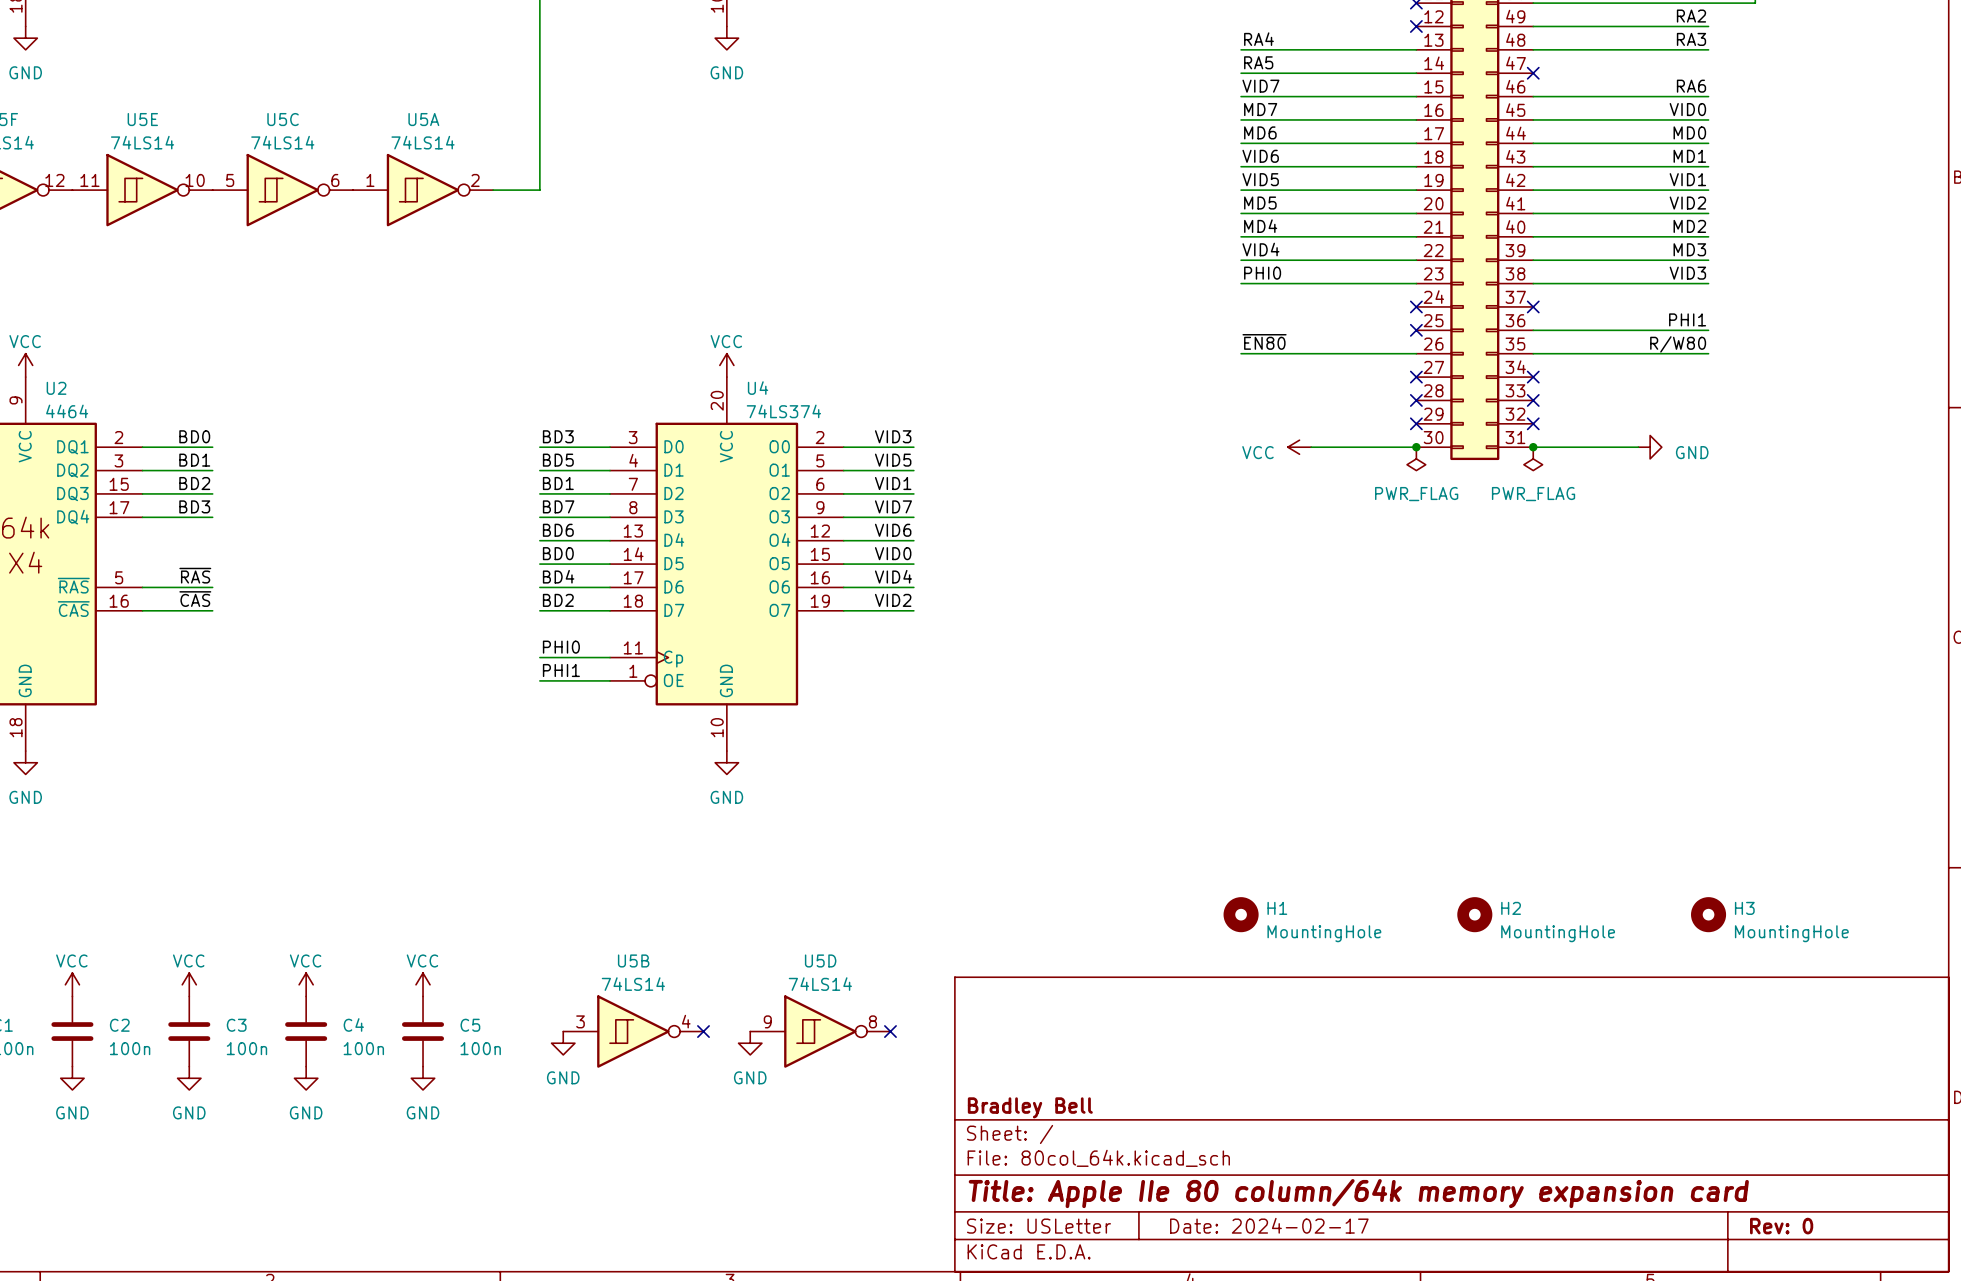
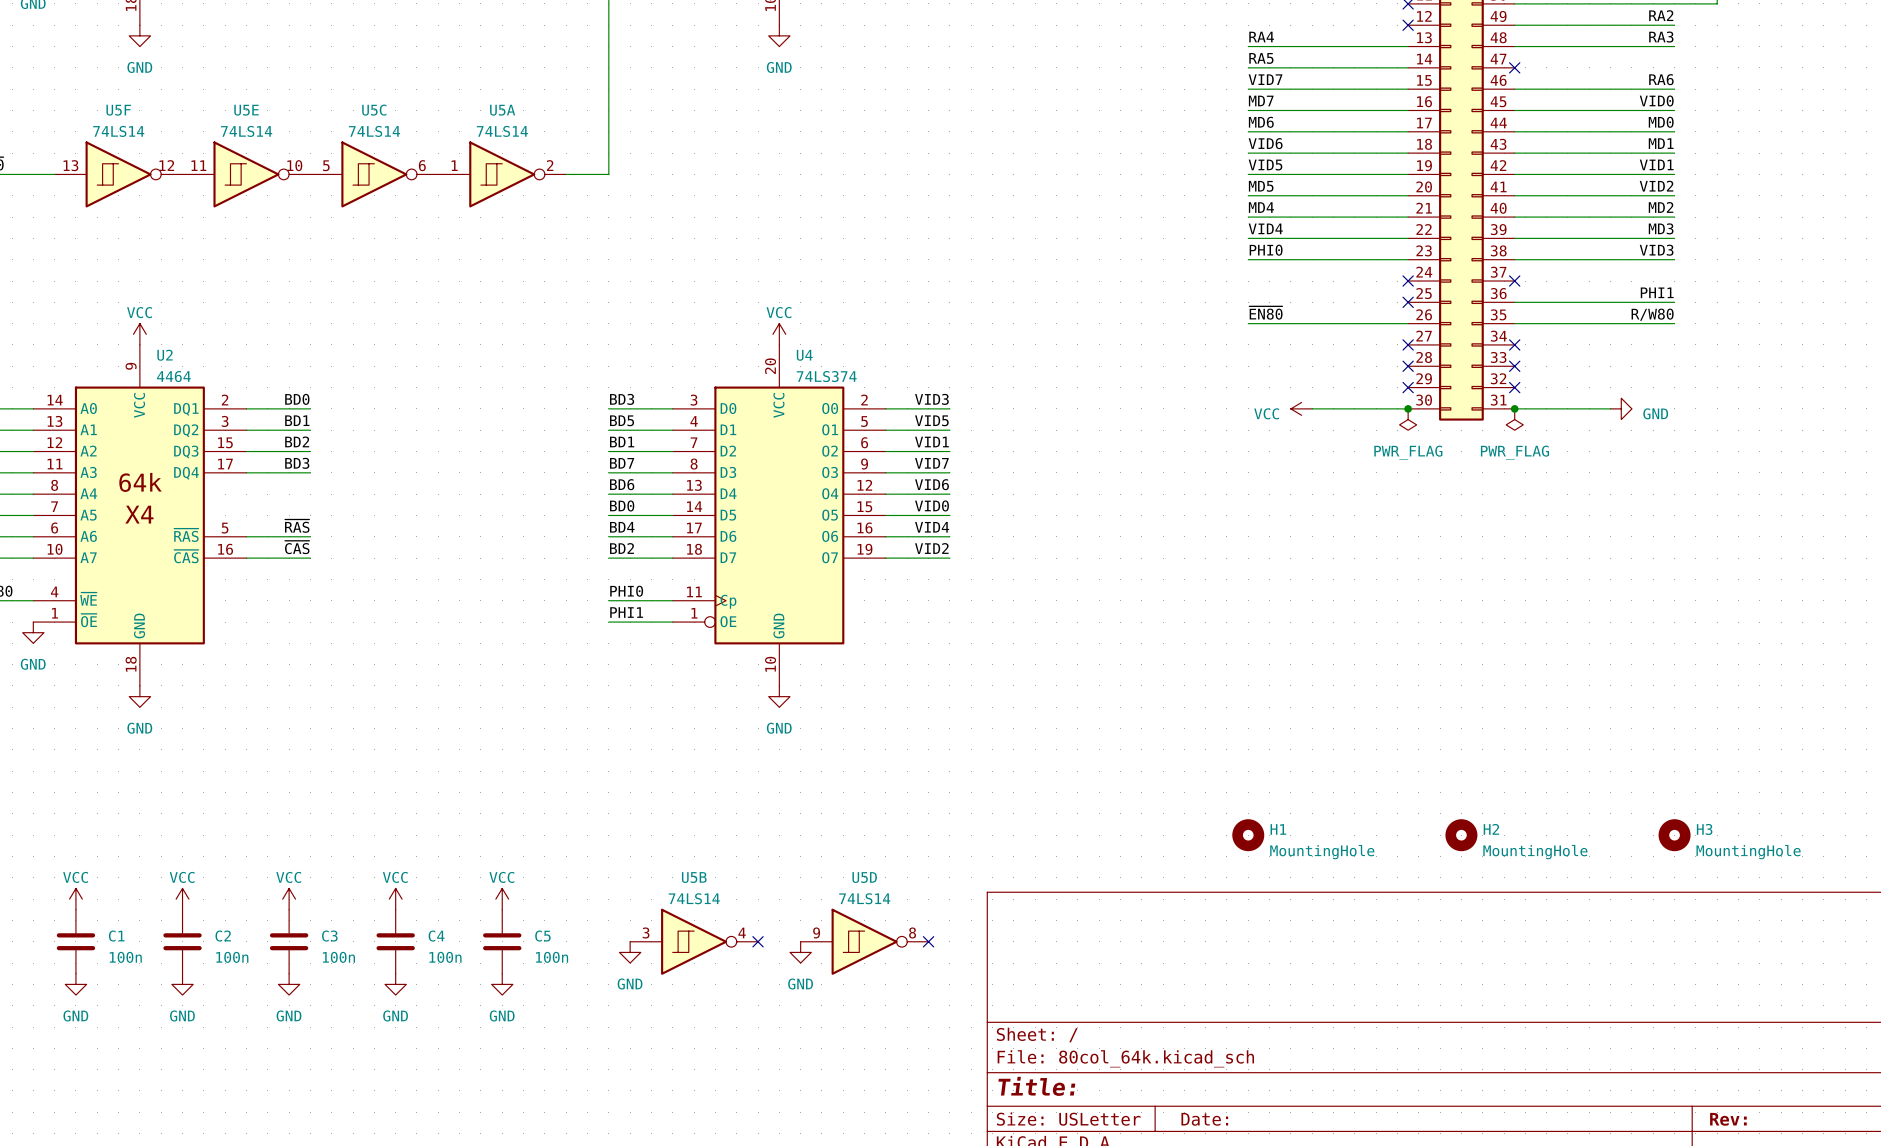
title block: Bradley Bell (1030, 1107) -> none
title block: Title: Apple IIe 80 column/64k memory expansion card (1358, 1193) -> Title: (1036, 1086)
title block: Date: 2024-02-17 (1269, 1225) -> Date: (1204, 1119)
title block: Rev: 0 (1781, 1226) -> Rev: (1728, 1119)

